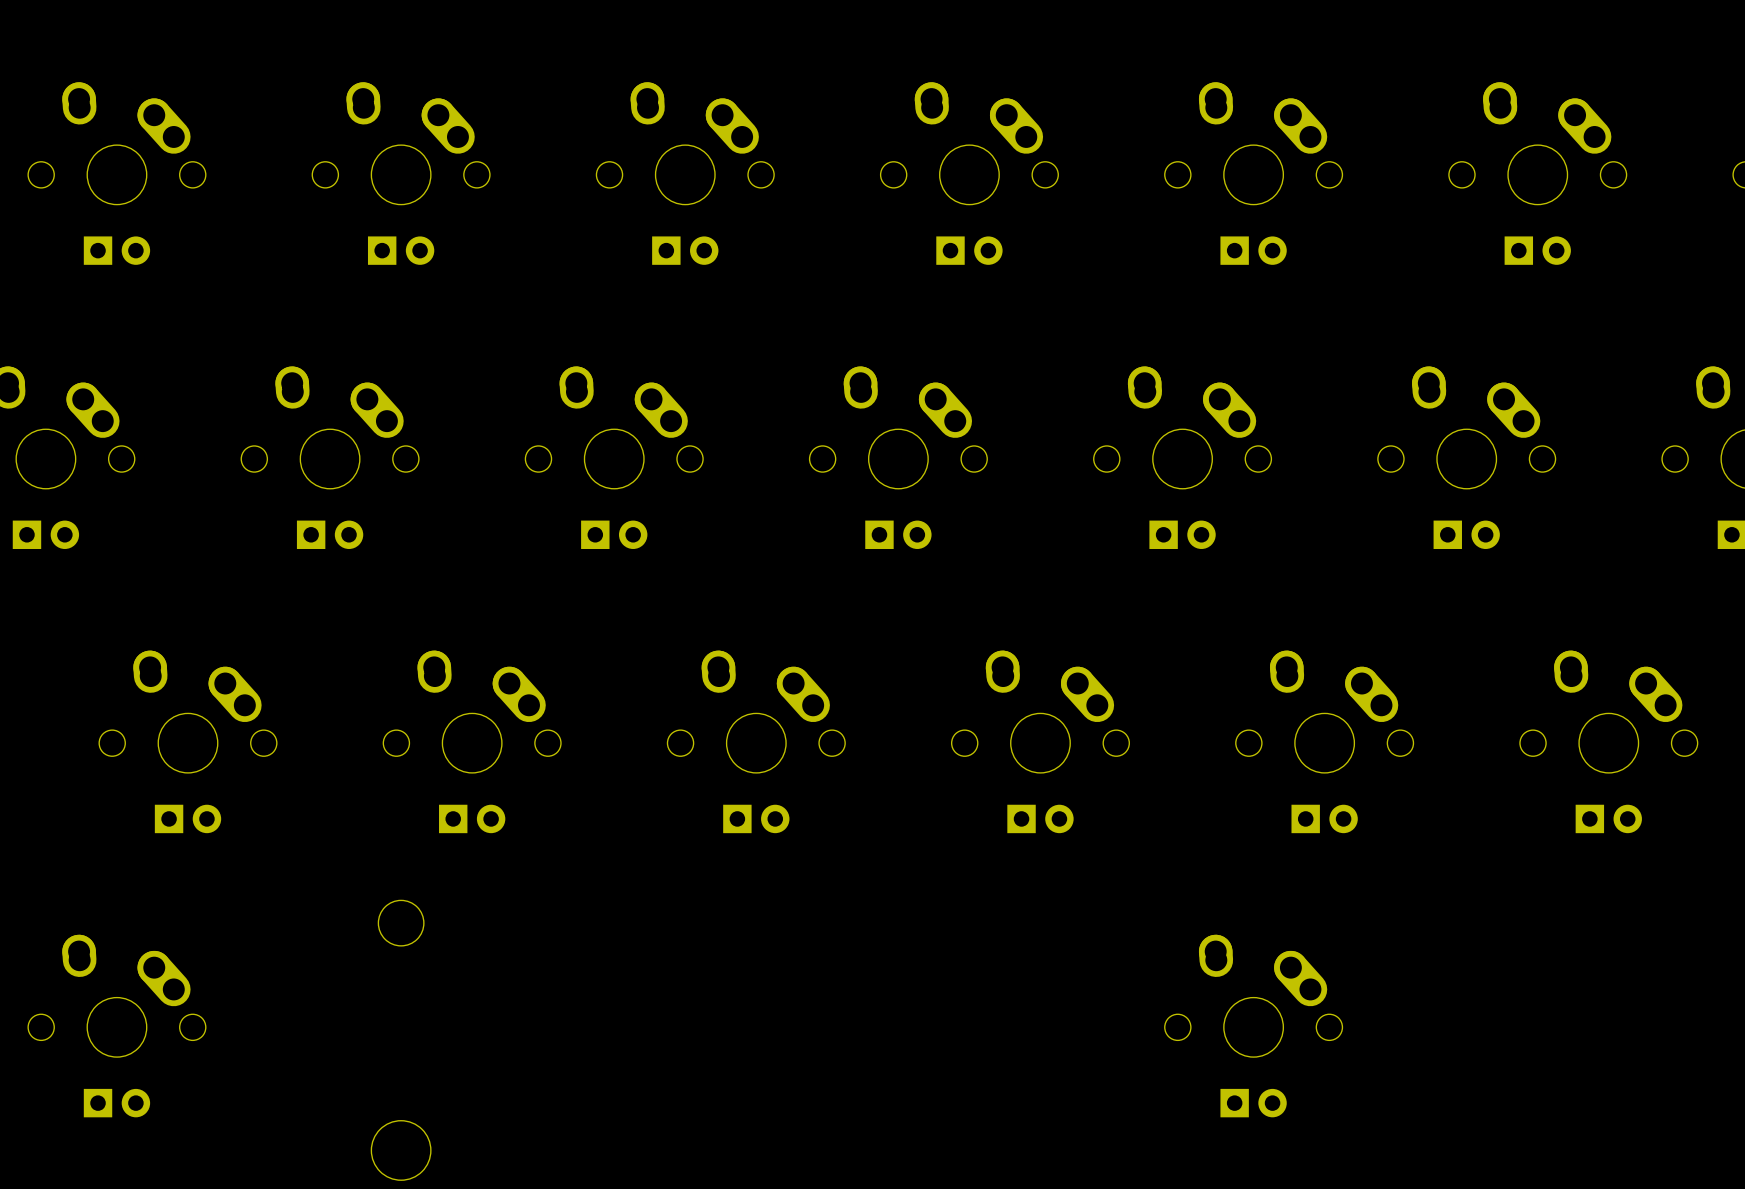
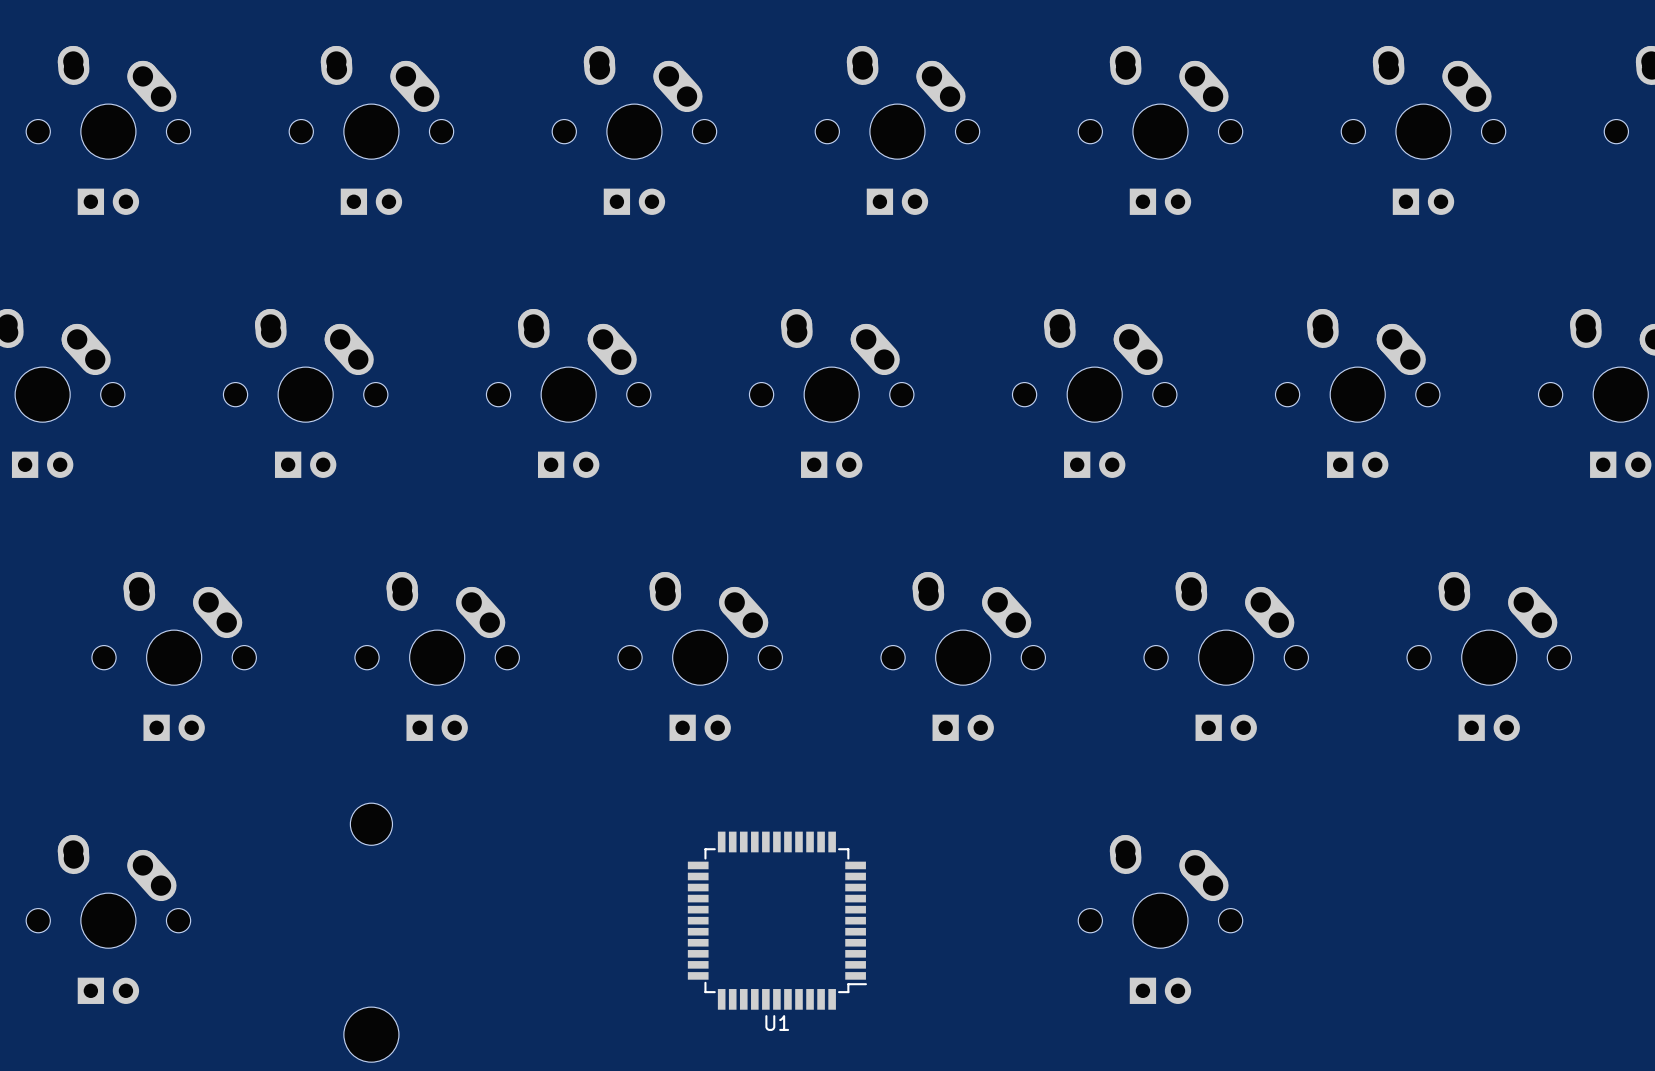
U1: none -> (777, 920)

